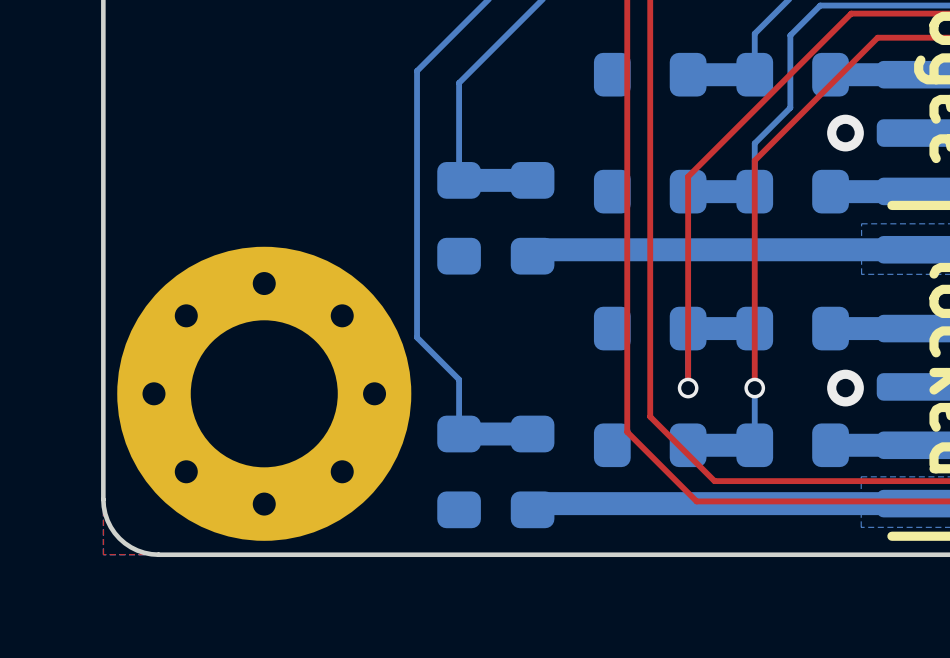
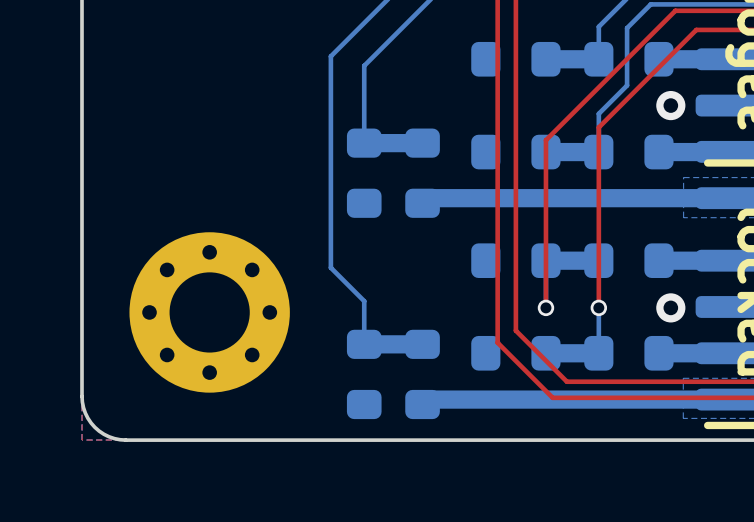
part footprint: [117, 246, 412, 541] -> [129, 232, 290, 393]

